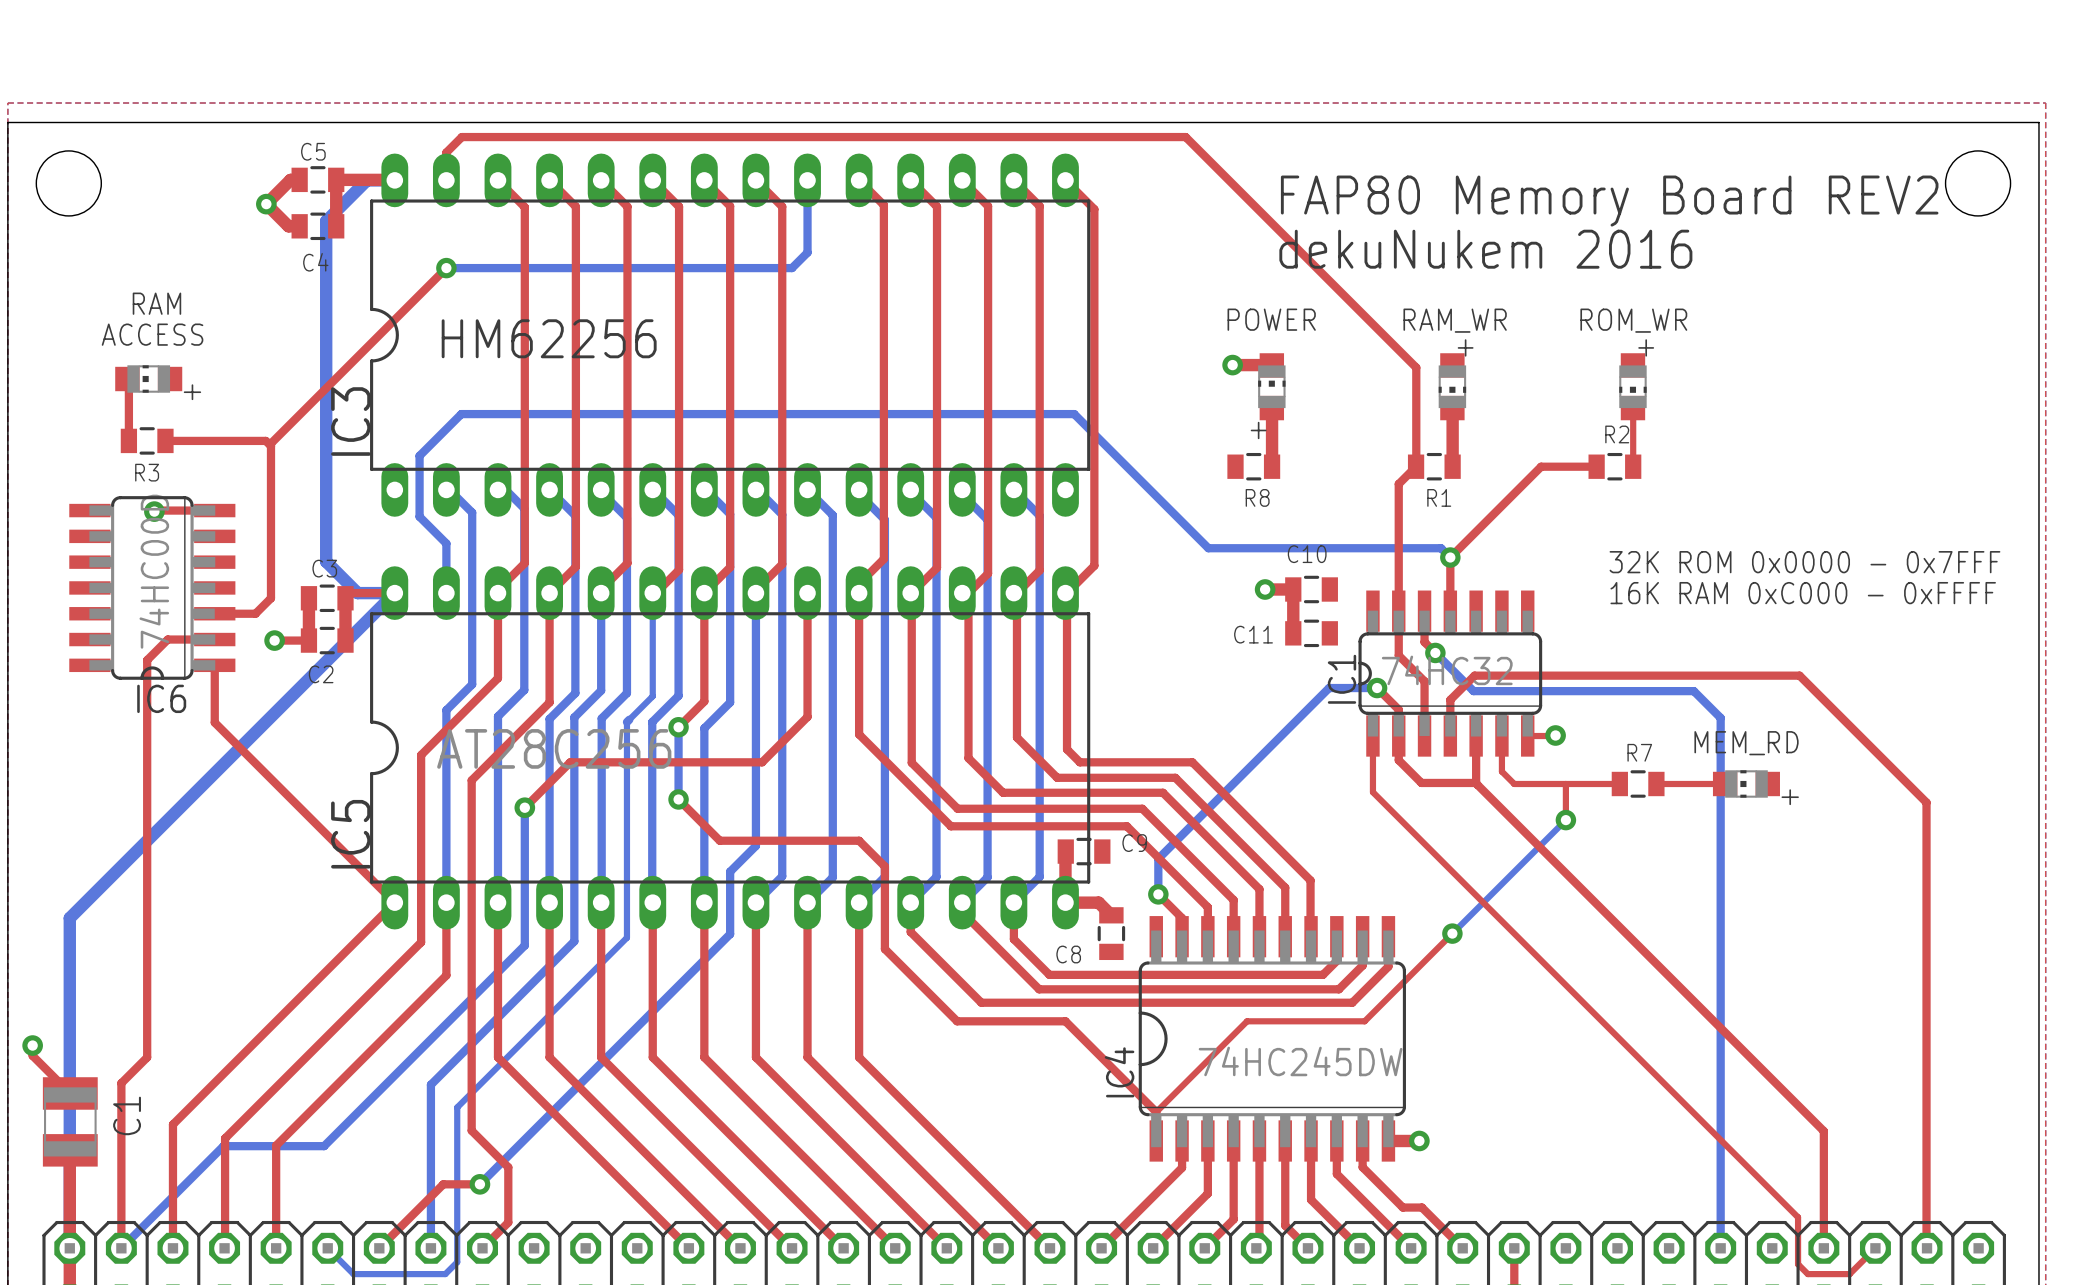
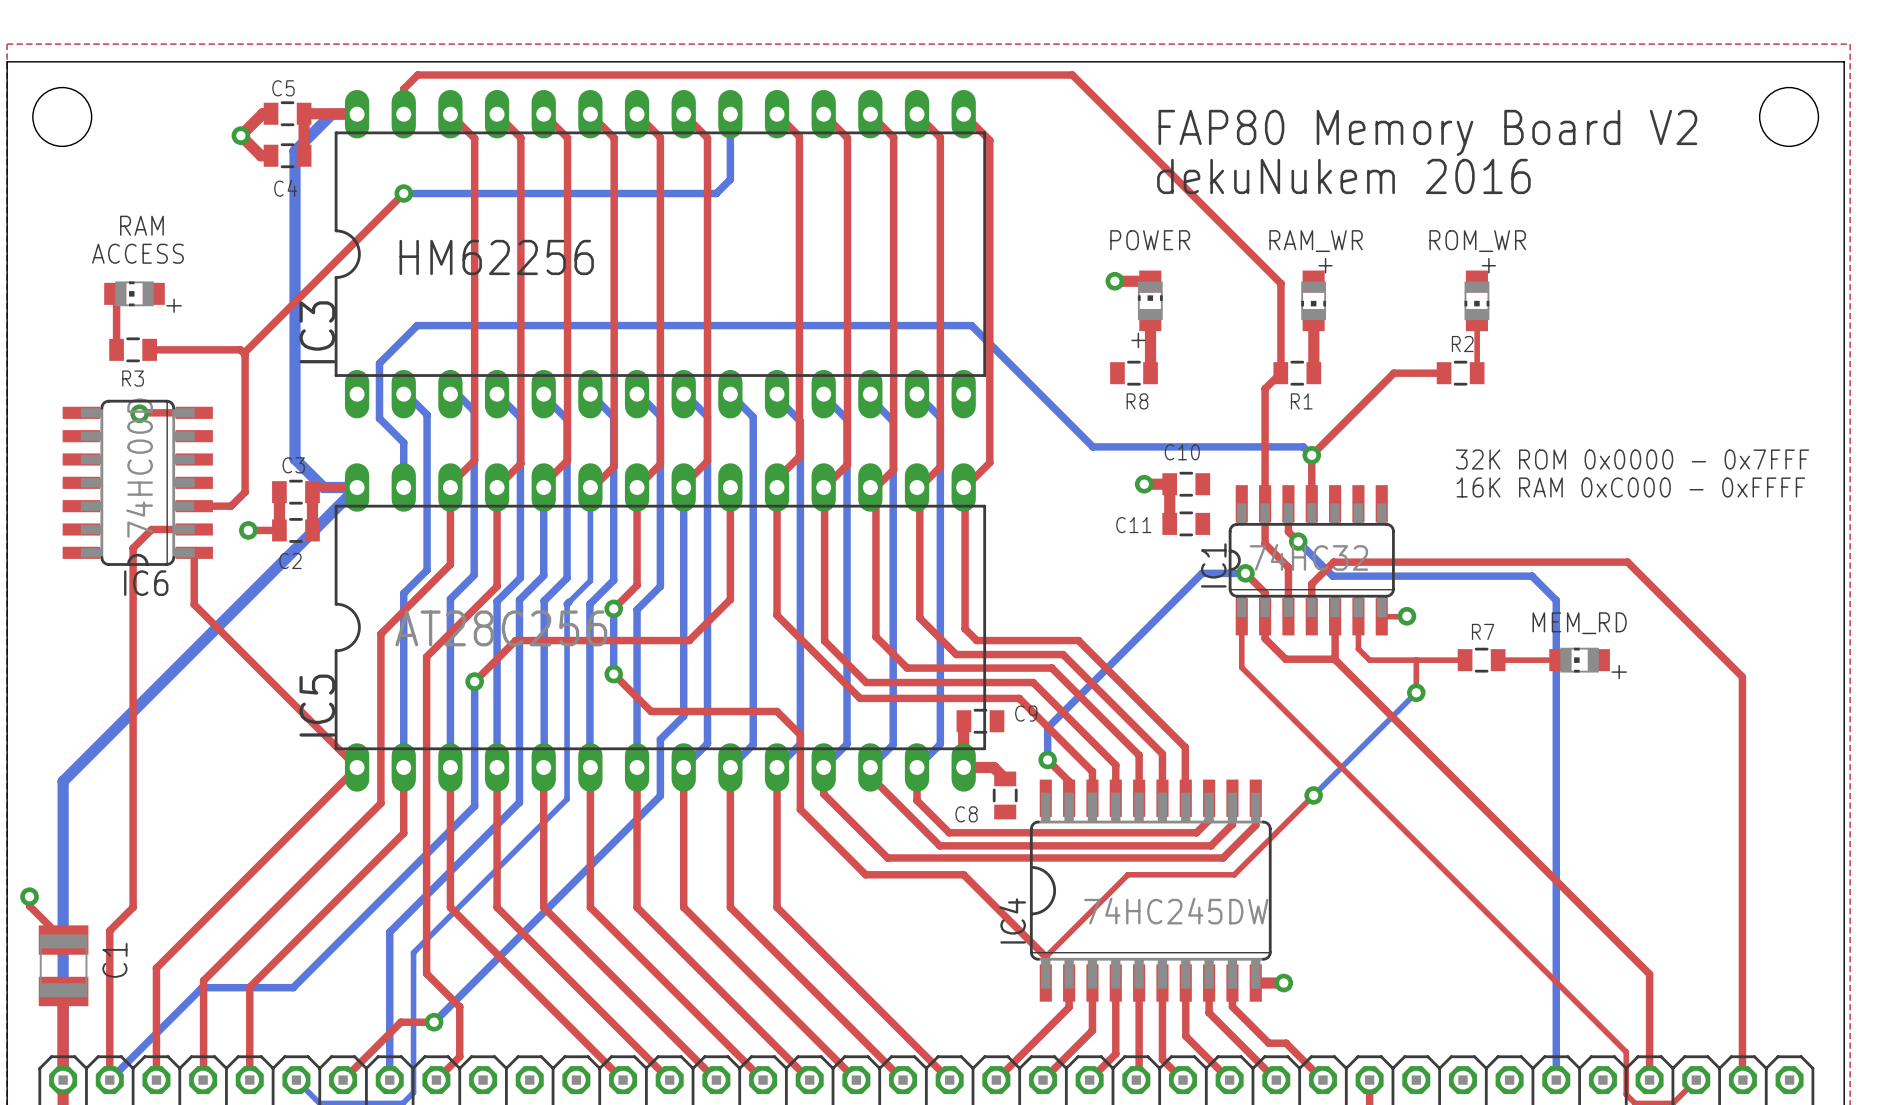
text: FAP80 Memory Board REV2 (1609, 201) -> FAP80 Memory Board V2 (1427, 132)

